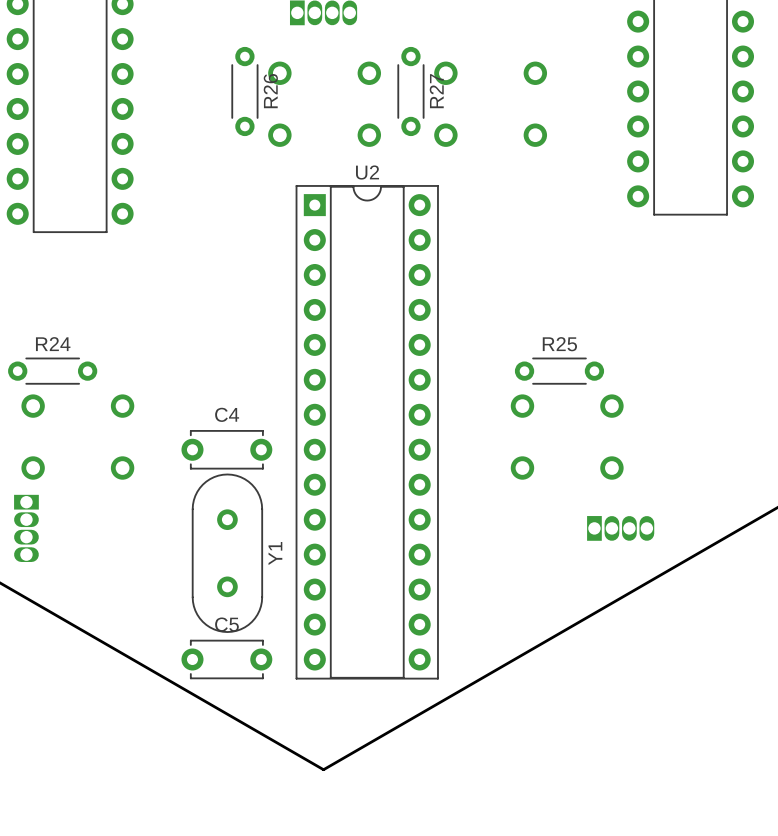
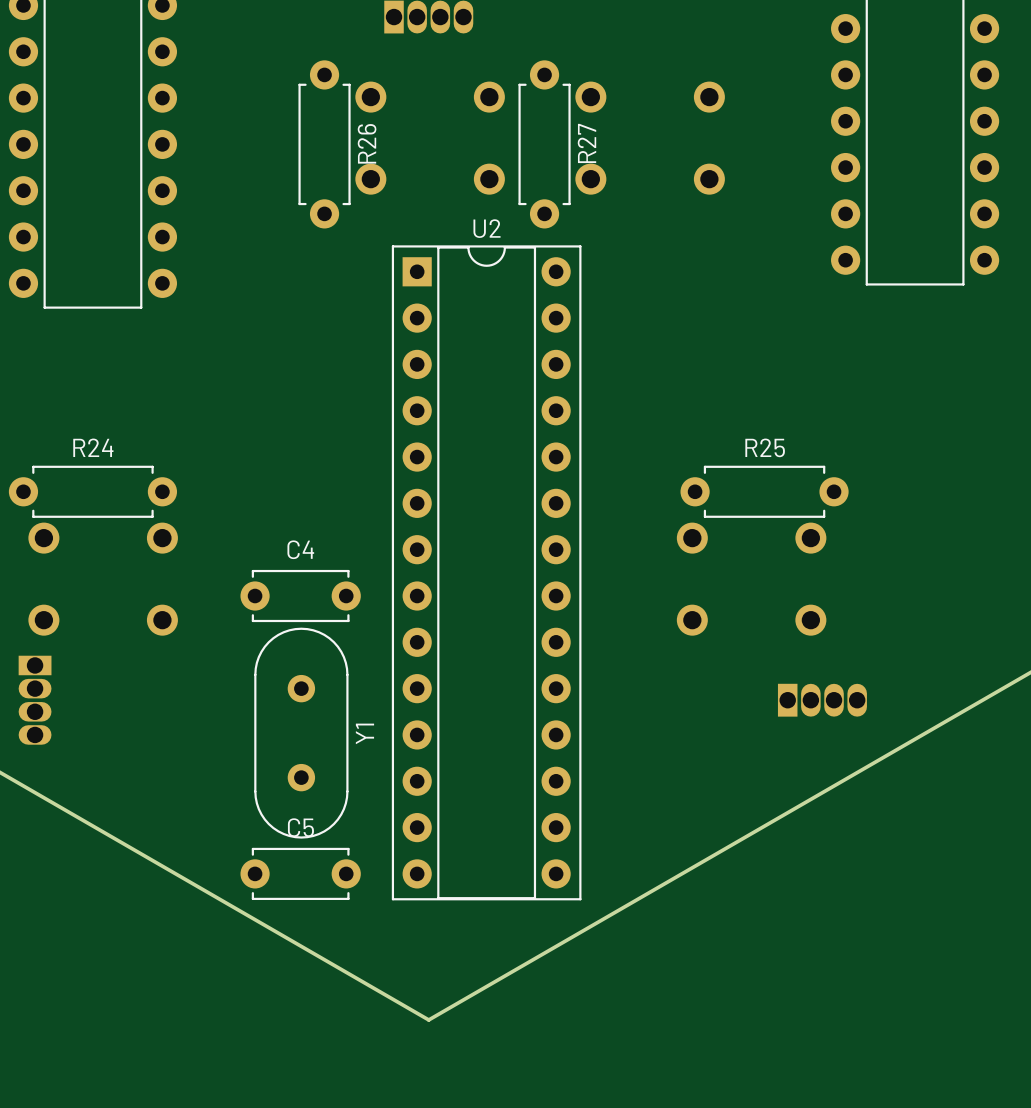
R26 footprint: [231, 46, 259, 137] -> [298, 60, 351, 229]
R27 footprint: [397, 46, 425, 137] -> [518, 60, 571, 229]
R24 footprint: [8, 357, 98, 385] -> [8, 465, 178, 518]
R25 footprint: [514, 357, 605, 385] -> [680, 465, 849, 518]

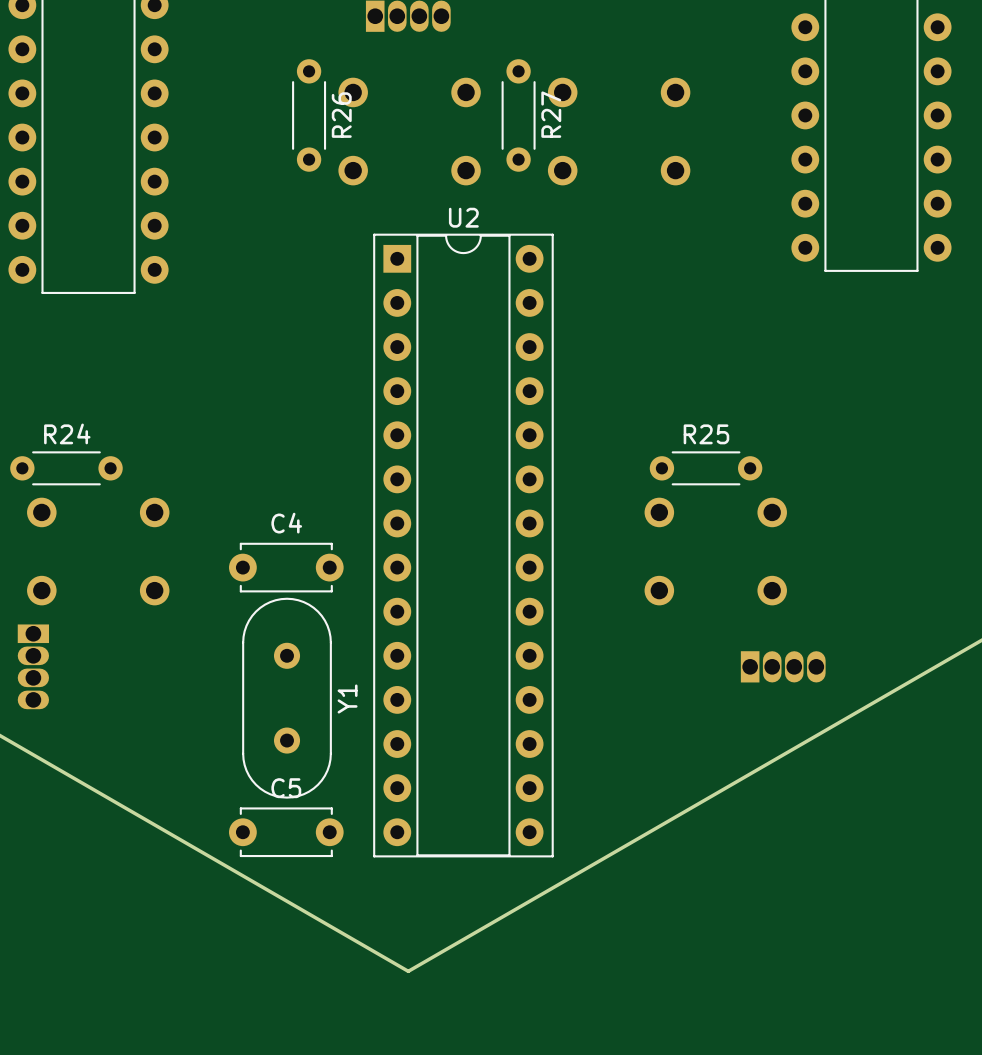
R26 footprint: [298, 60, 351, 229] -> [292, 59, 327, 172]
R27 footprint: [518, 60, 571, 229] -> [501, 59, 536, 172]
R24 footprint: [8, 465, 178, 518] -> [10, 451, 123, 486]
R25 footprint: [680, 465, 849, 518] -> [649, 451, 763, 486]

